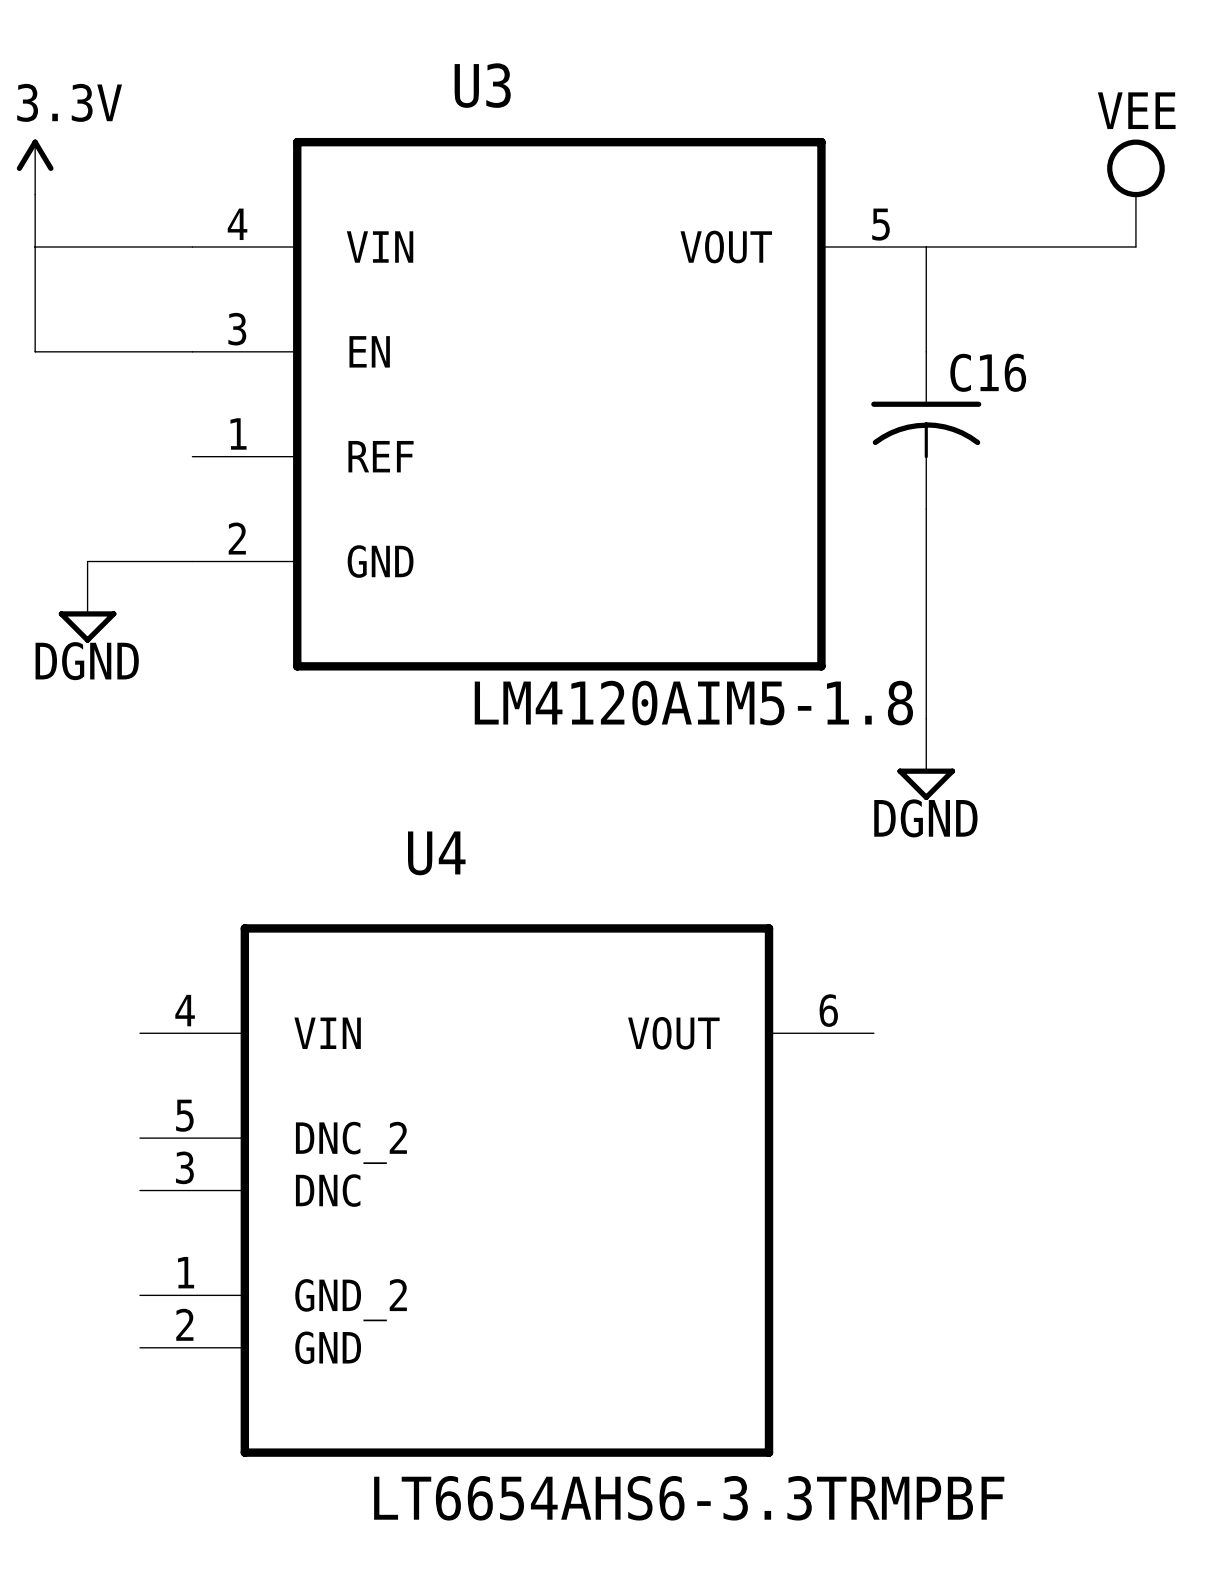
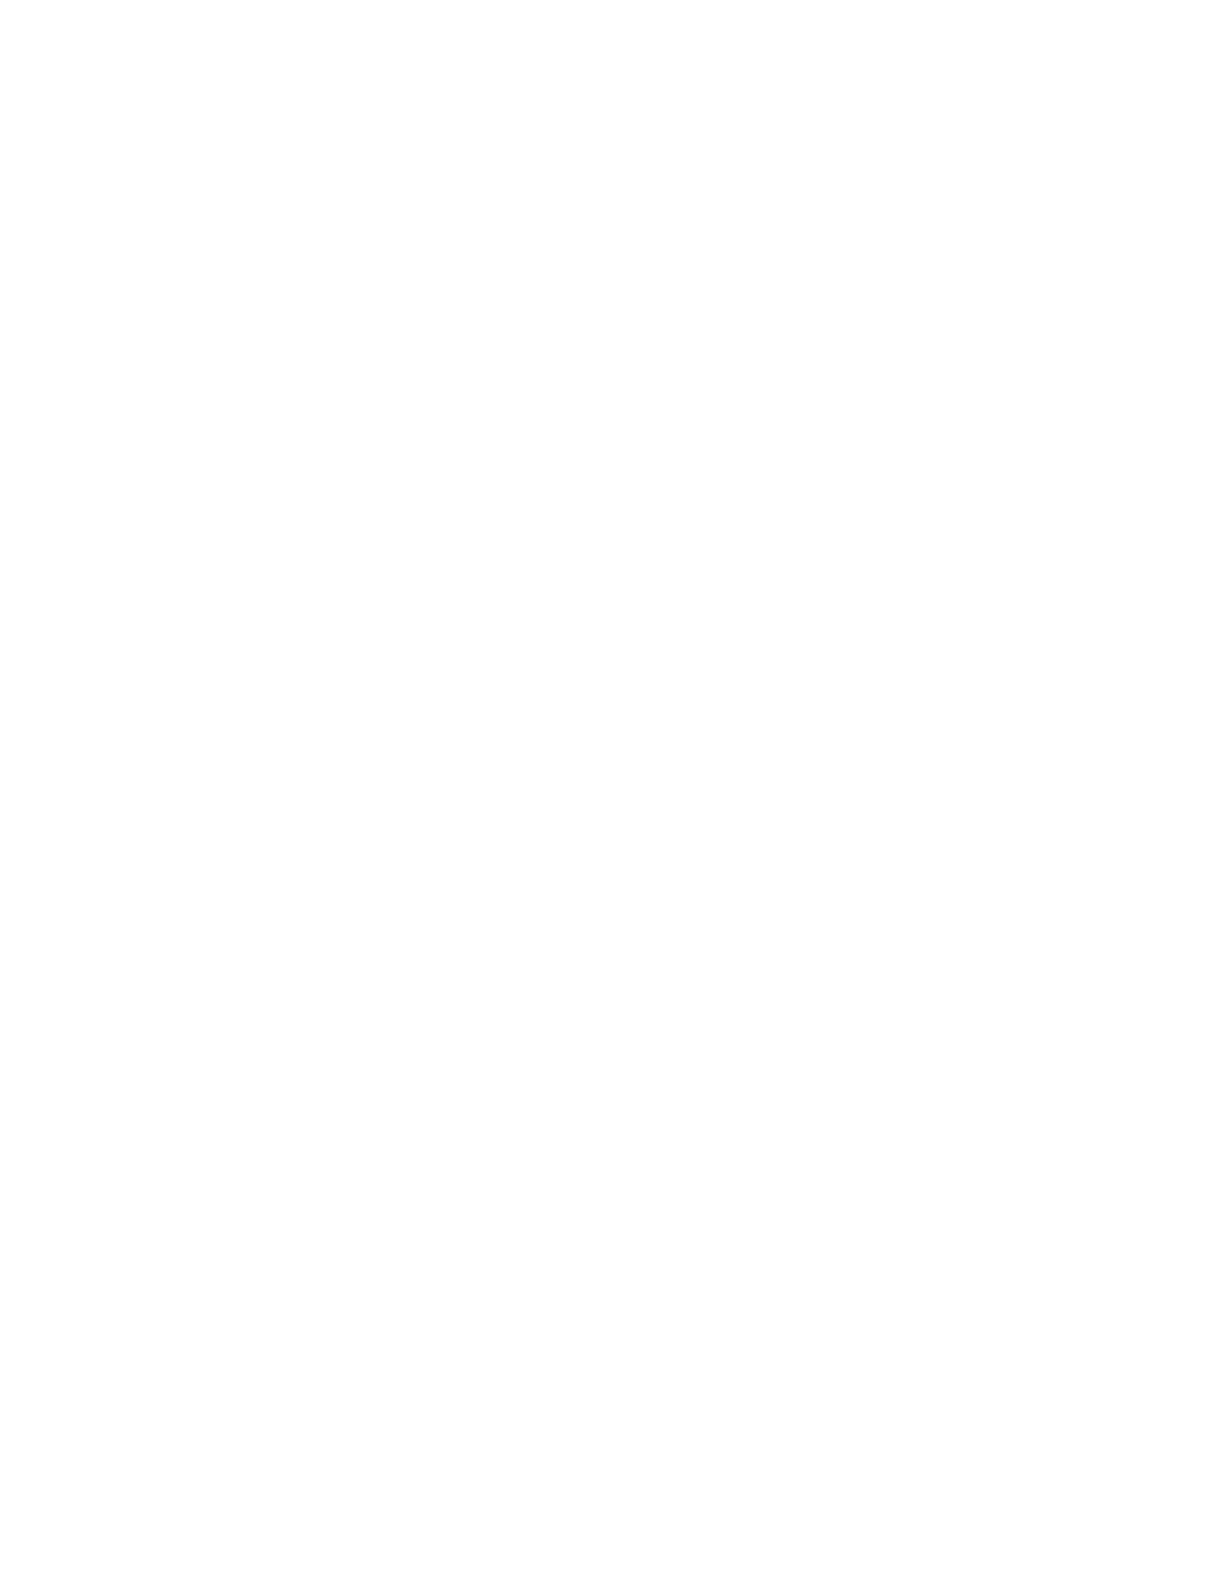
power symbol: 3.3V (35, 167) -> none
power symbol: VEE (1135, 193) -> none
wire: (35, 194) (35, 351) (192, 351) -> none
wire: (35, 247) (192, 247) -> none
wire: (1135, 247) (926, 247) (926, 351) -> none
U3: LM4120AIM5-1.8 (559, 404) -> none
C16: (926, 430) -> none
wire: (926, 509) (926, 718) -> none
wire: (87, 561) (192, 561) -> none
power symbol: DGND (87, 602) -> none
power symbol: DGND (926, 759) -> none
U4: LT6654AHS6-3.3TRMPBF (506, 1190) -> none

